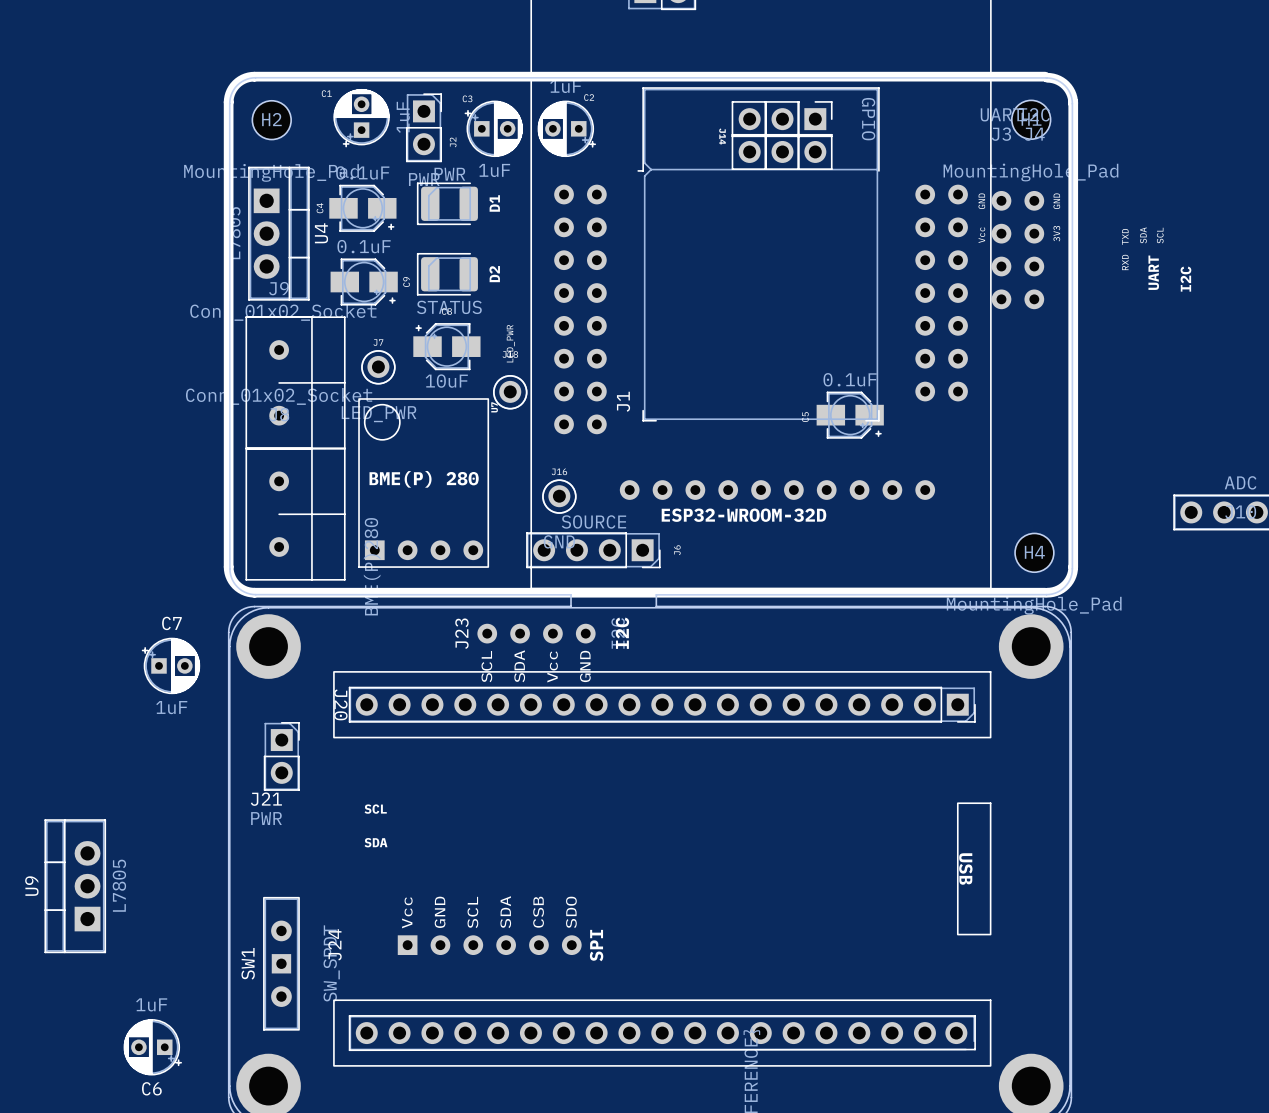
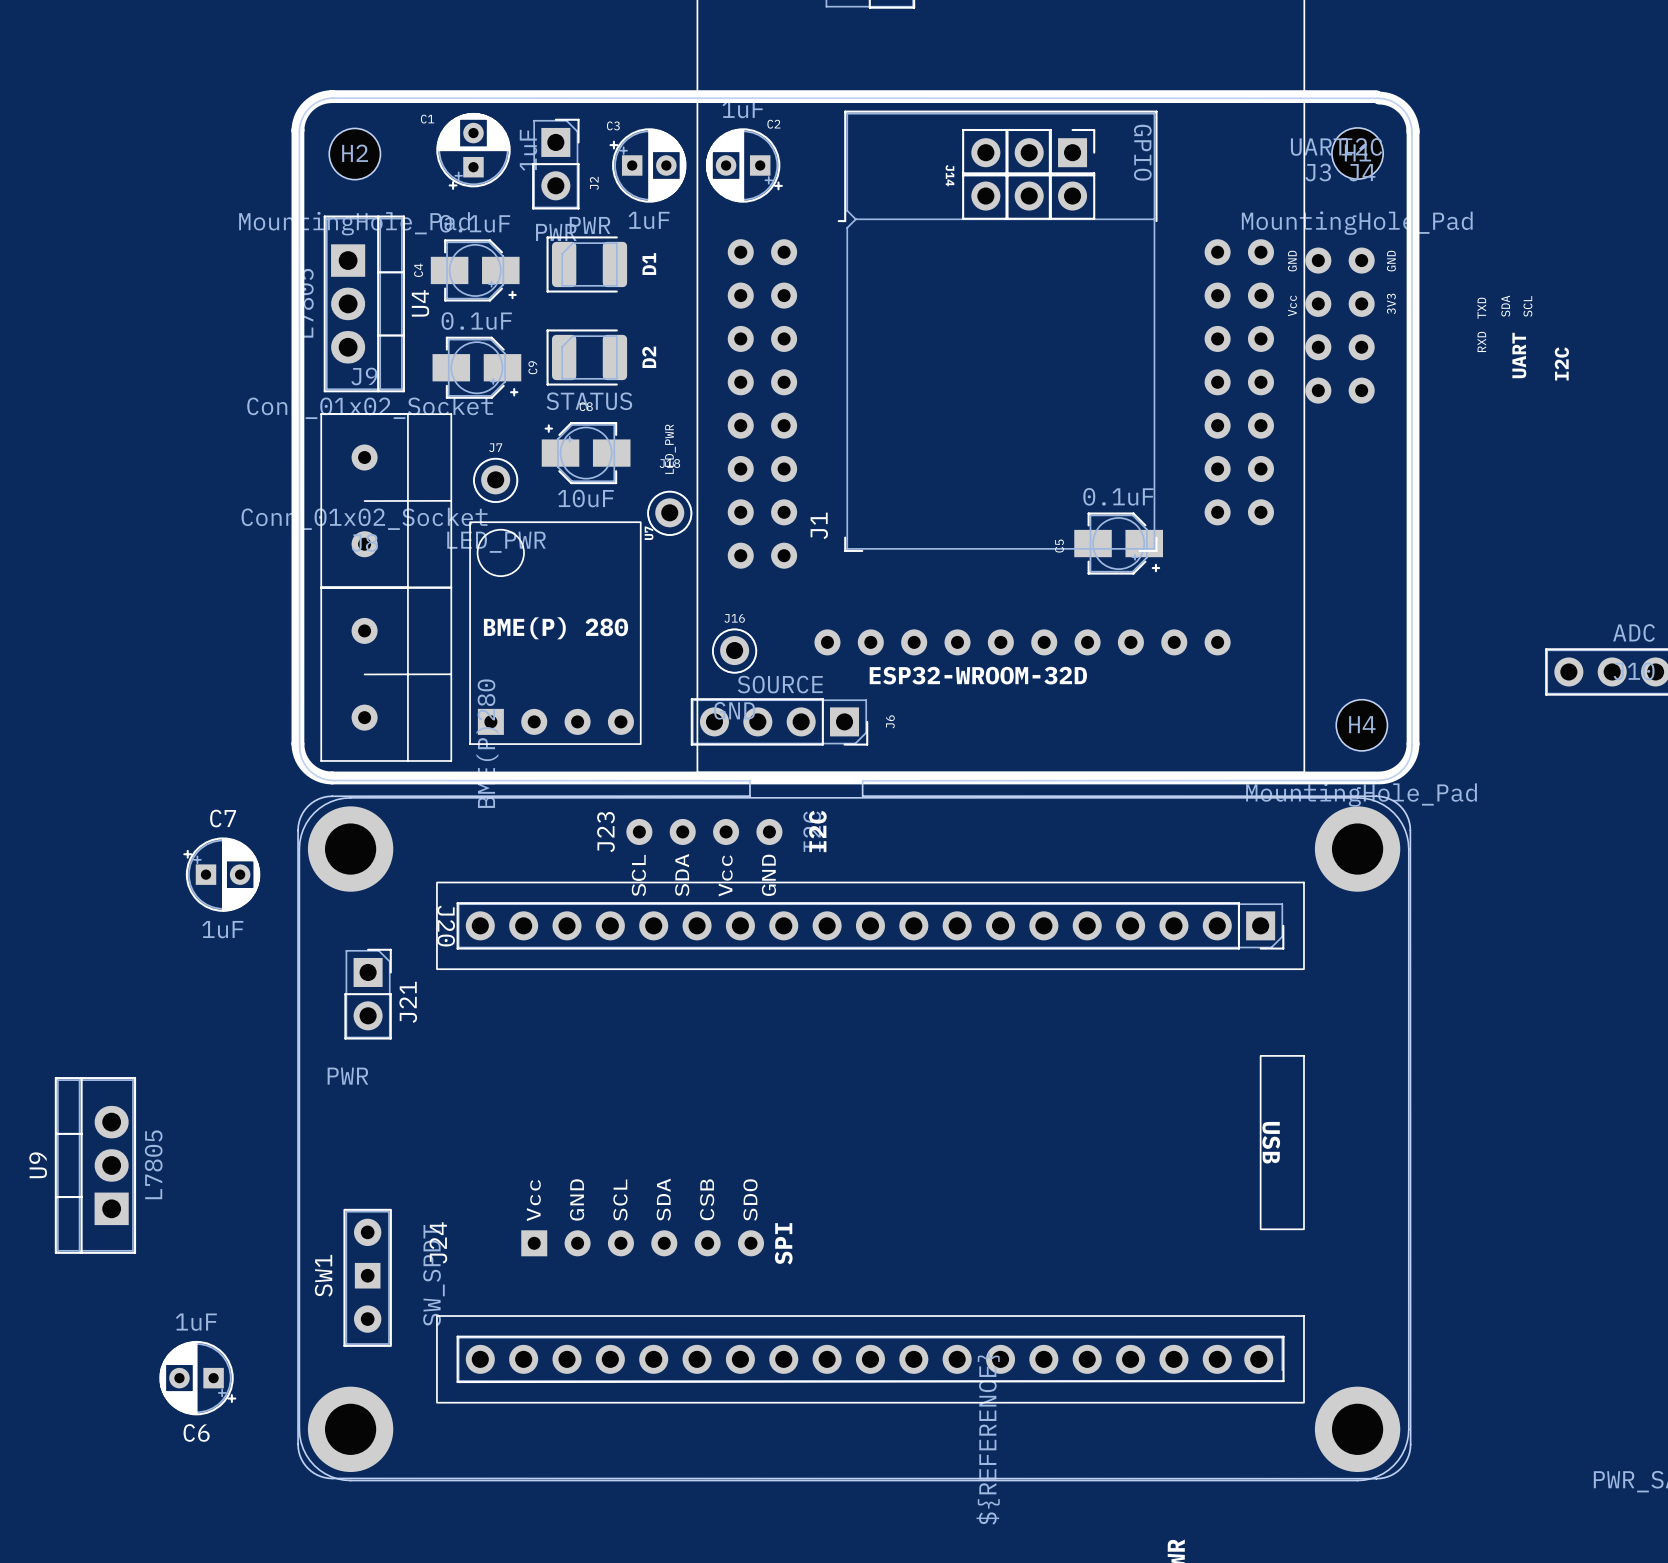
J21 name rotation: 0° (266, 799) -> 90° counterclockwise (408, 1002)
J21 name position: J21 (266, 799) -> J21 (408, 1002)
text: SCL (375, 809) -> none
text: SDA (376, 842) -> none
SW1 footprint: [263, 896, 300, 1031] -> [343, 1208, 392, 1347]

